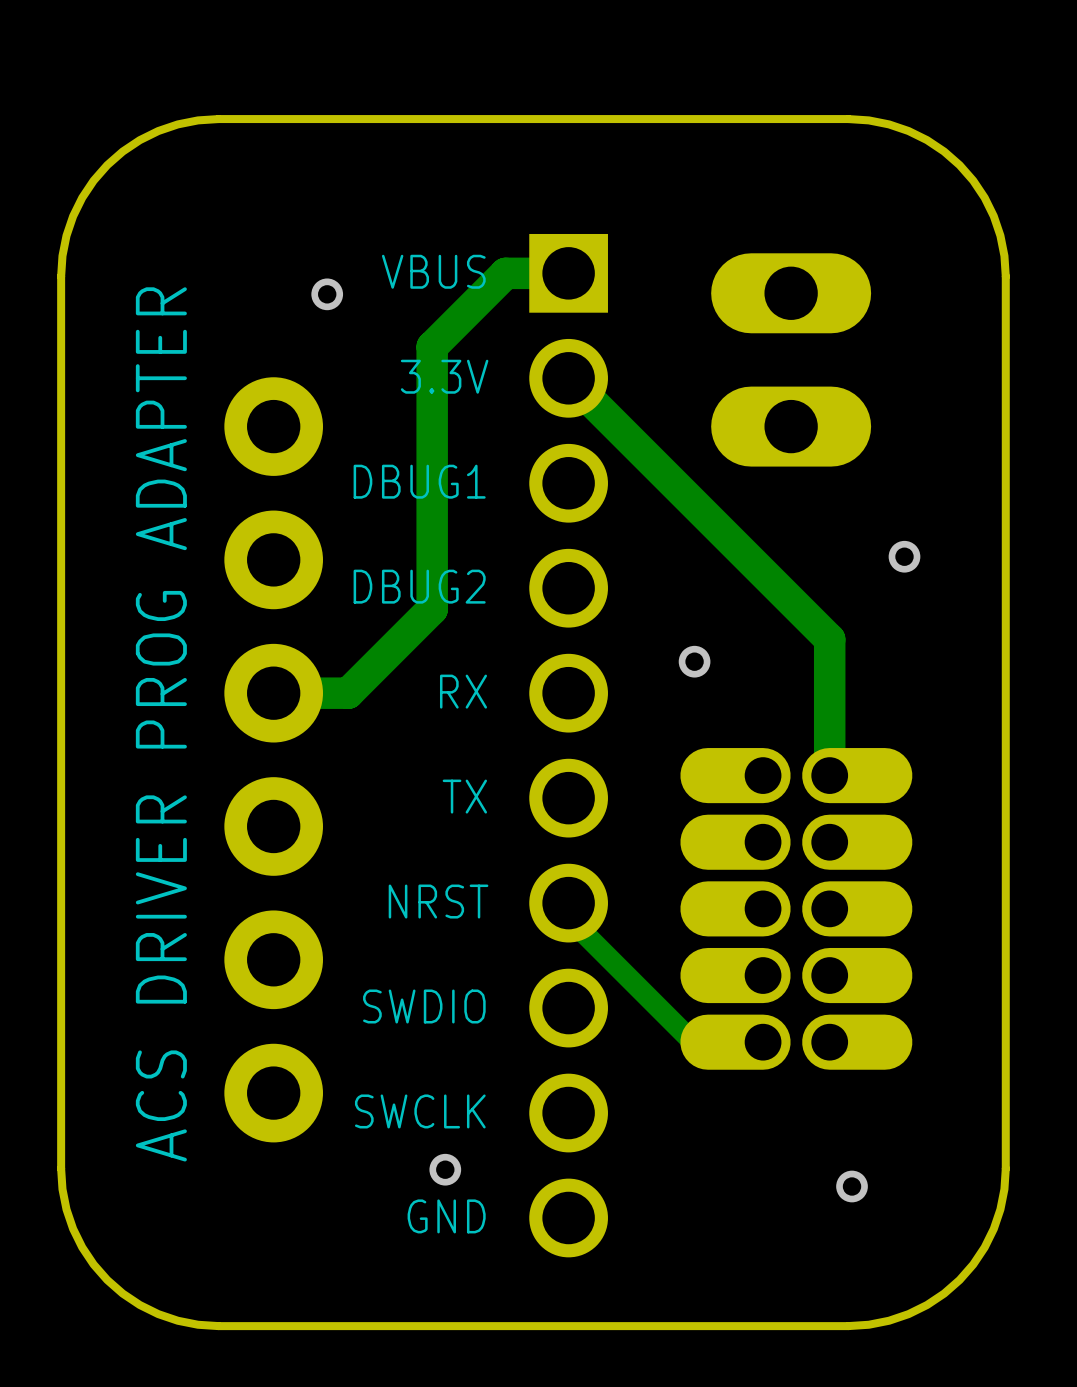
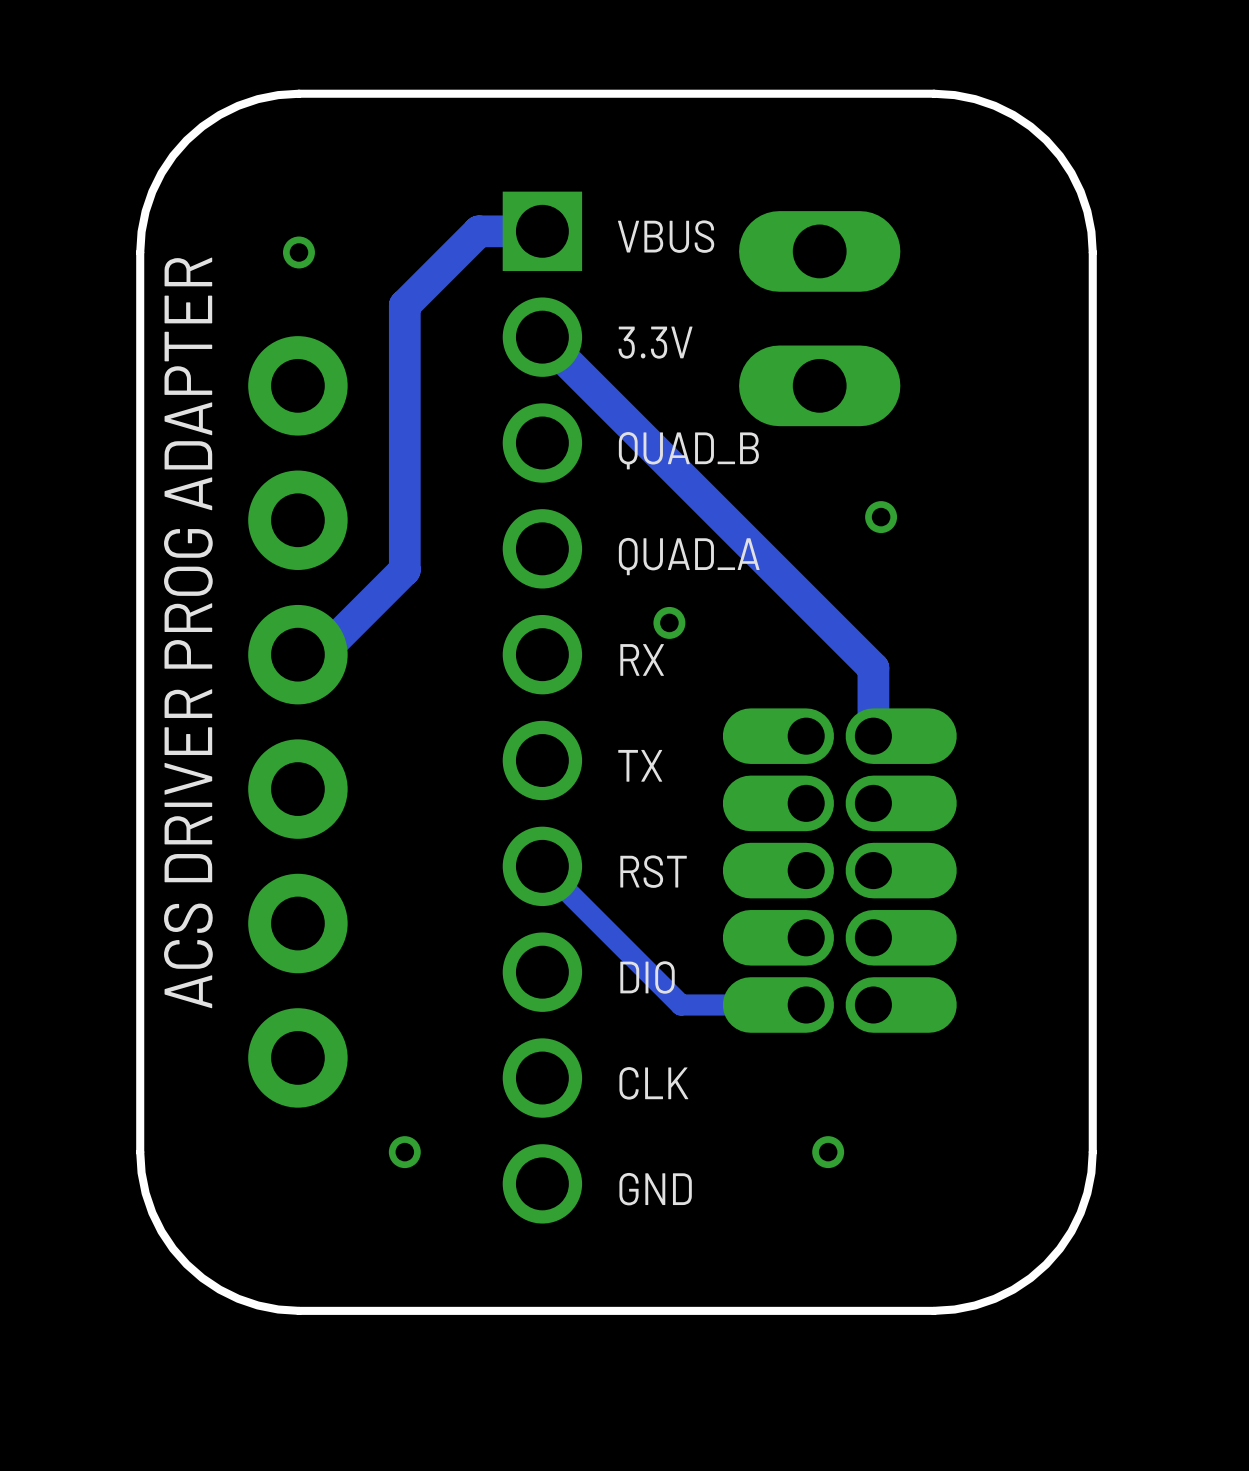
track: none -> (542, 231) (478, 231) (404, 305) (404, 570) (320, 654) (297, 654)
text position: VBUS (433, 271) -> VBUS (666, 236)
track: (568, 273) (505, 273) (432, 346) (432, 609) (348, 693) (273, 693) -> none
via position: (327, 294) -> (298, 252)
part position: (791, 359) -> (819, 318)
track: none -> (542, 337) (873, 668) (873, 736)
text position: 3.3V (444, 376) -> 3.3V (655, 342)
track: (568, 378) (829, 639) (829, 775) -> none
text: none -> QUAD_B (688, 450)
text: DBUG1 (419, 481) -> none
via: none -> (881, 517)
via: (904, 556) -> none
text: none -> QUAD_A (689, 556)
text: DBUG2 (419, 586) -> none
via: none -> (669, 622)
via: (694, 661) -> none
text position: RX (463, 691) -> RX (642, 659)
text position: ACS DRIVER PROG ADAPTER (161, 724) -> ACS DRIVER PROG ADAPTER (188, 632)
part position: (568, 745) -> (542, 707)
part position: (273, 759) -> (297, 721)
text position: TX (464, 796) -> TX (640, 765)
track: none -> (542, 866) (681, 1005) (806, 1005)
text: none -> RST (653, 871)
text: NRST (438, 901) -> none
track: (568, 903) (568, 917) (693, 1042) (763, 1042) -> none
part position: (796, 908) -> (839, 870)
text: none -> DIO (647, 977)
text: SWDIO (424, 1006) -> none
text: none -> CLK (653, 1083)
text: SWCLK (420, 1111) -> none
via position: (445, 1169) -> (404, 1152)
via position: (852, 1186) -> (828, 1152)
text position: GND (446, 1216) -> GND (655, 1189)

